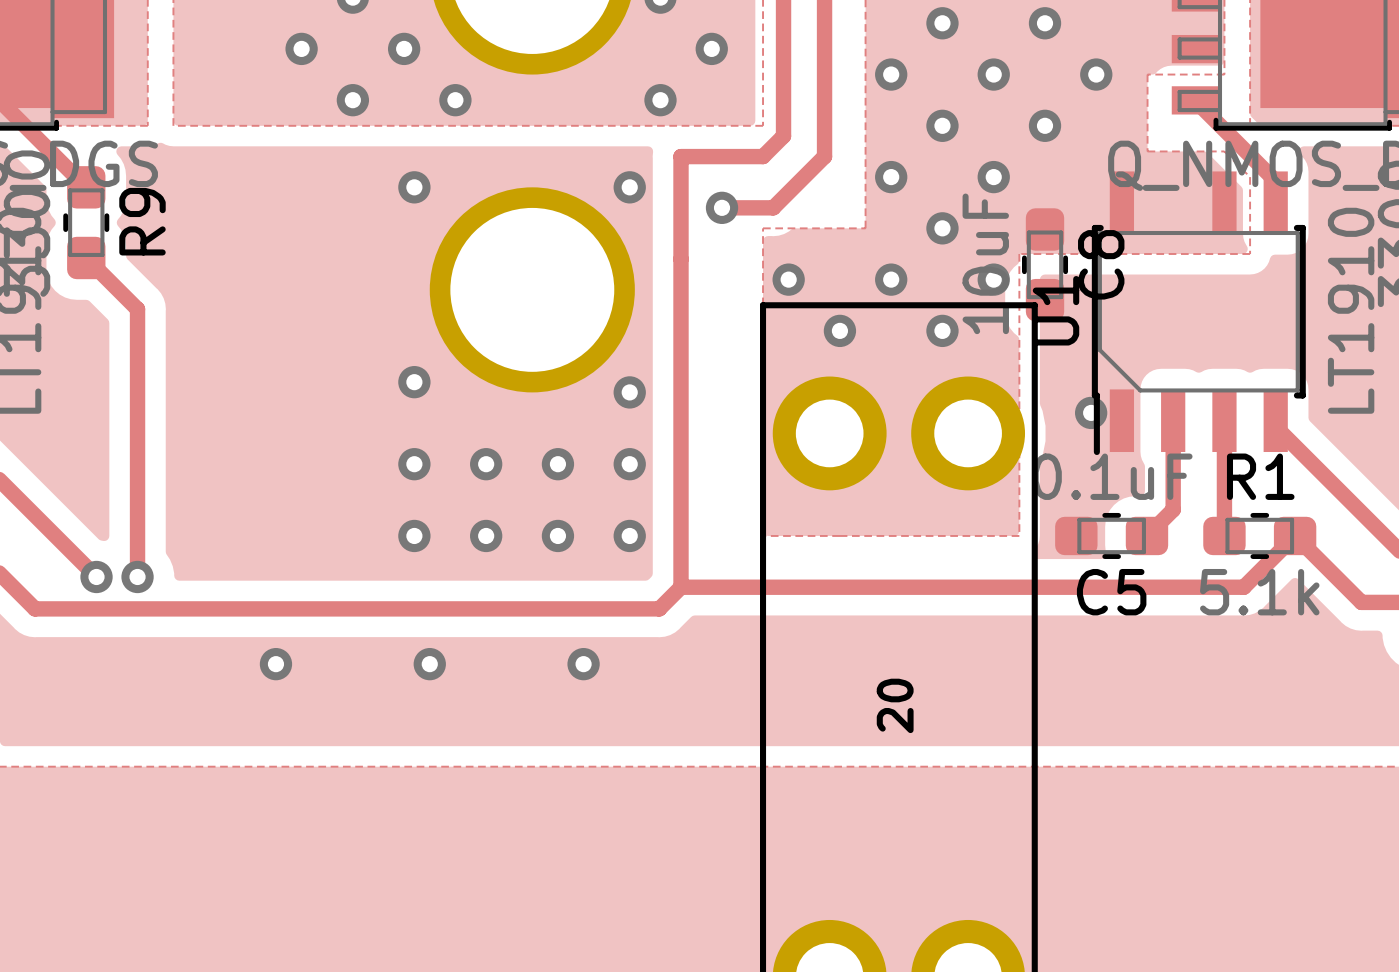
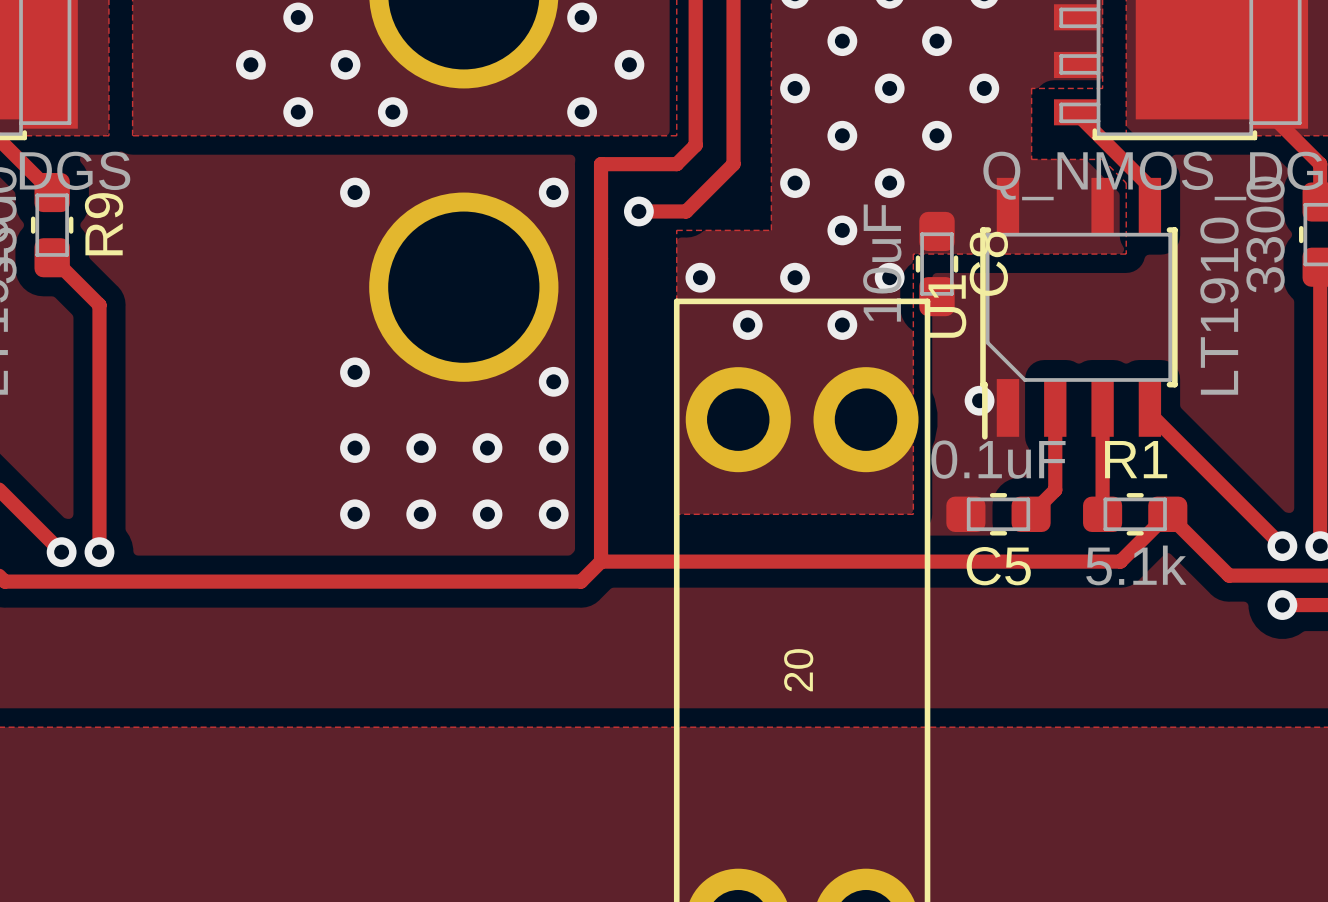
via: (275, 664) -> none
via: (429, 664) -> none
via: (583, 664) -> none

